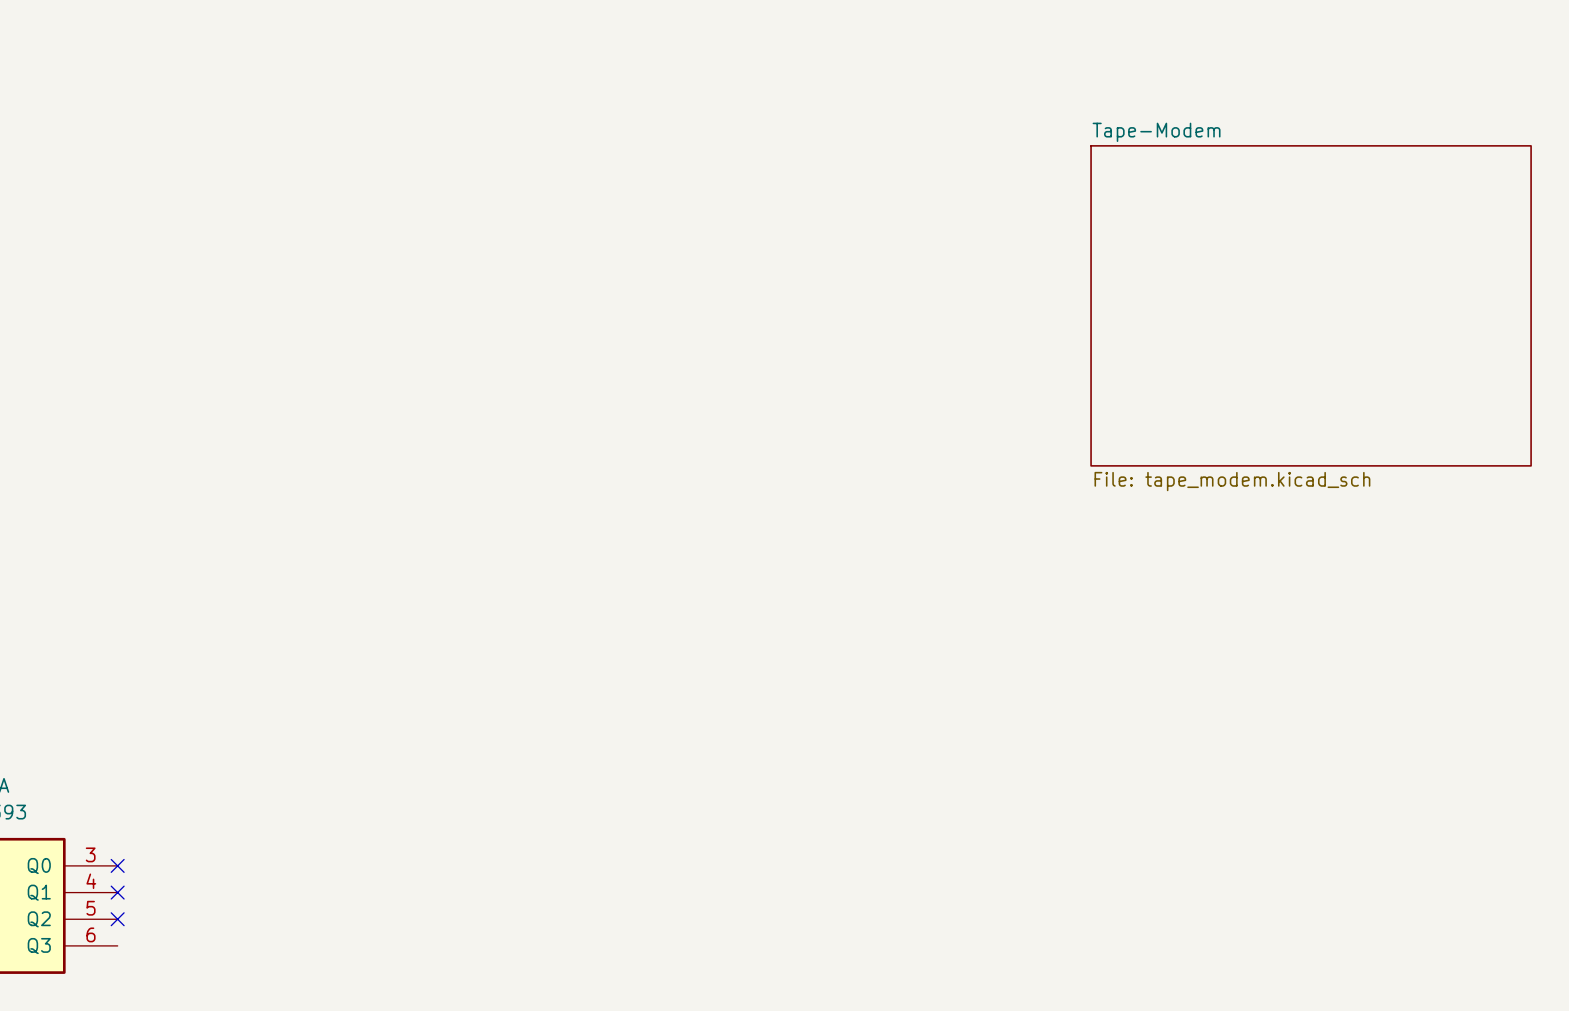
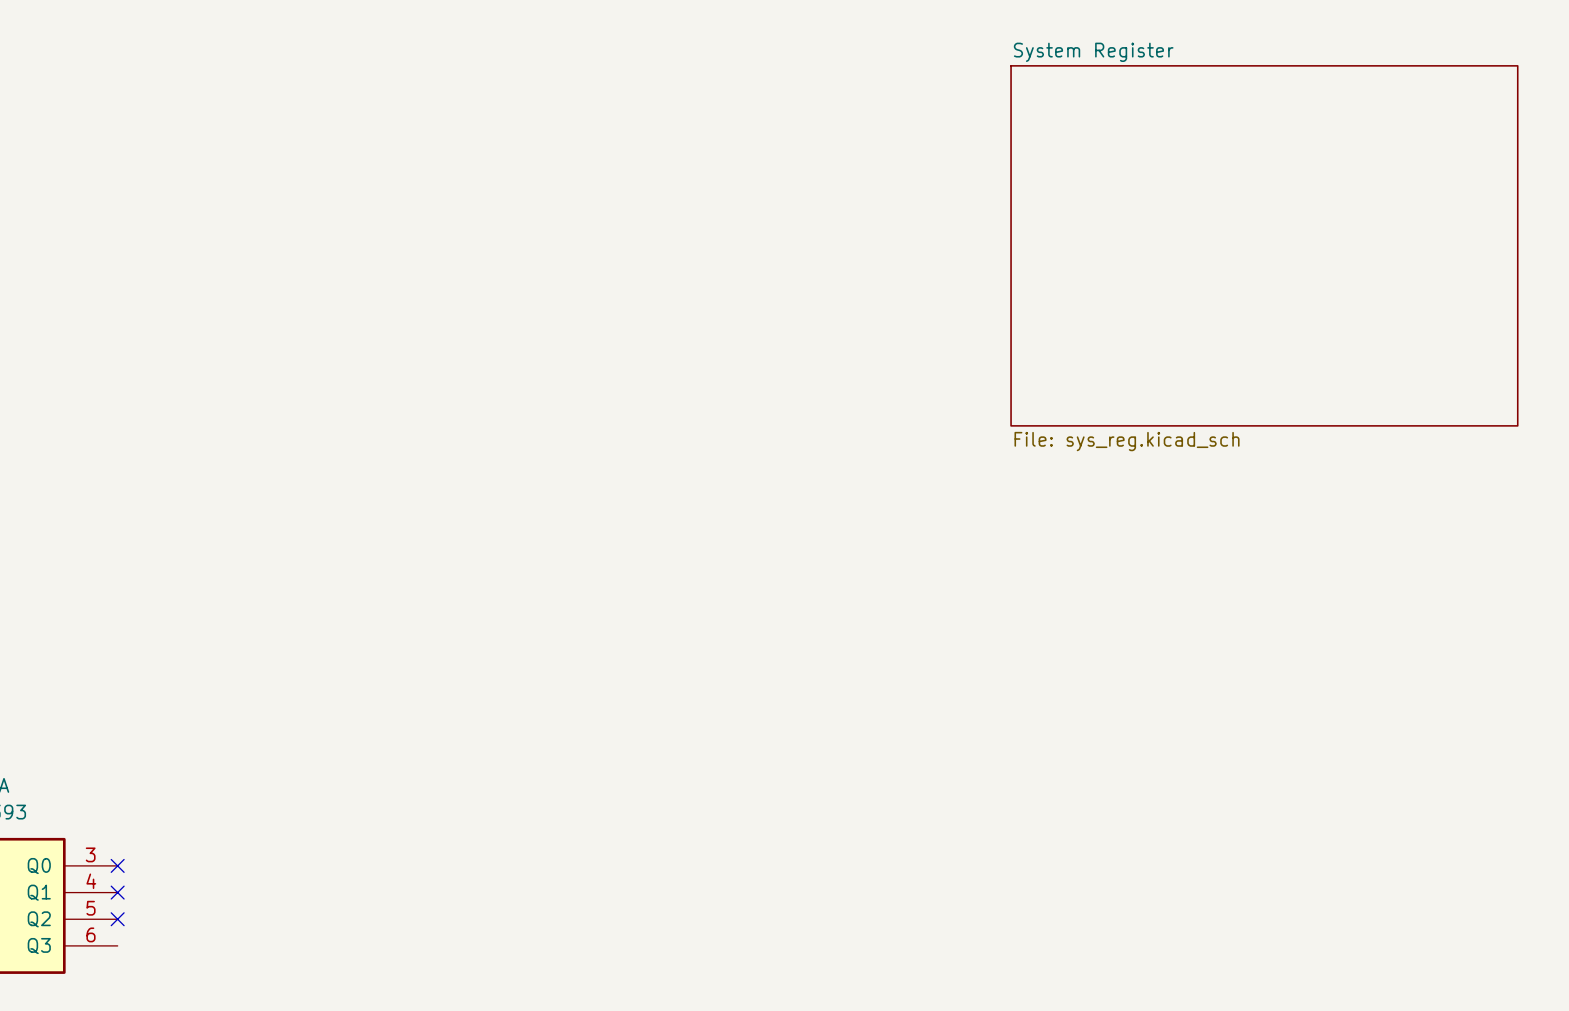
sheet System Register: none -> File: sys_reg.kicad_sch (1264, 245)
sheet Tape-Modem: File: tape_modem.kicad_sch (1311, 305) -> none

